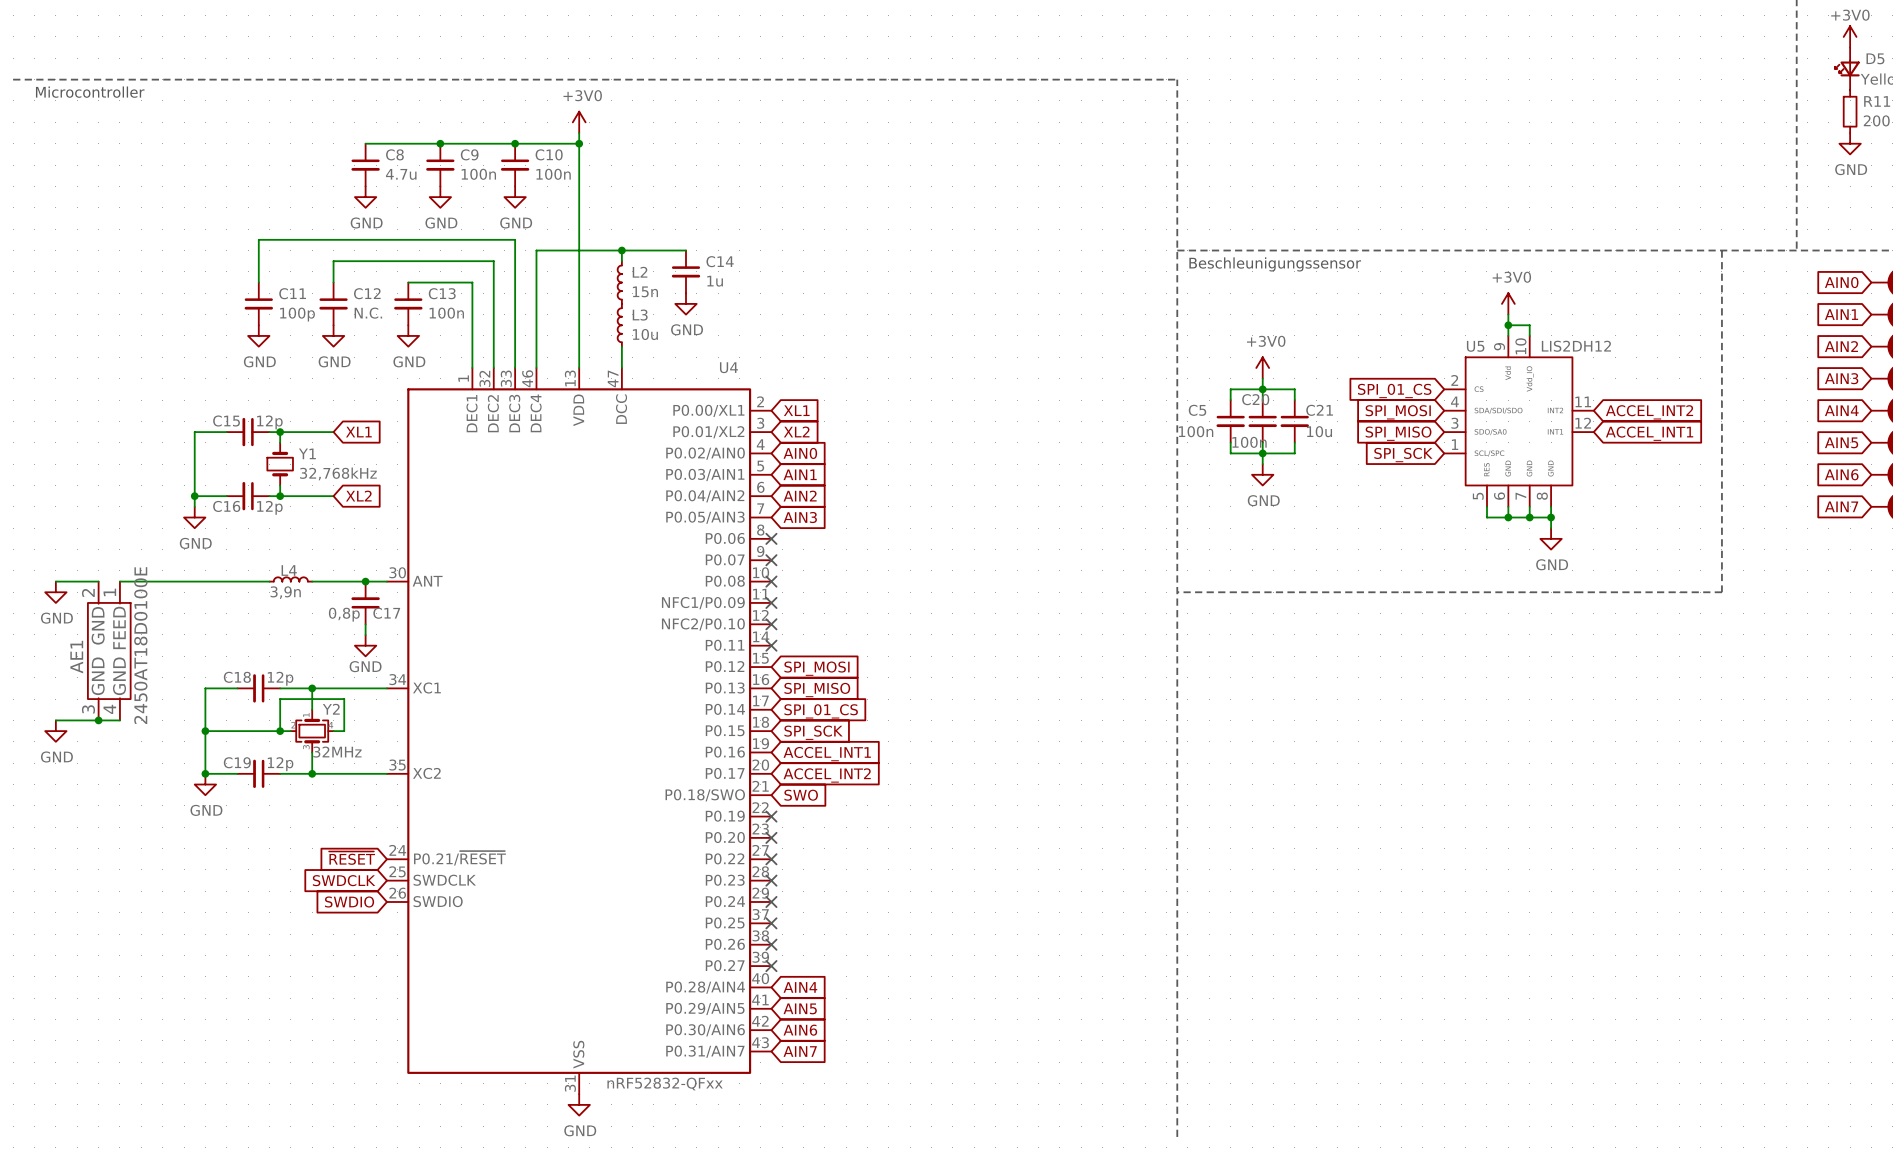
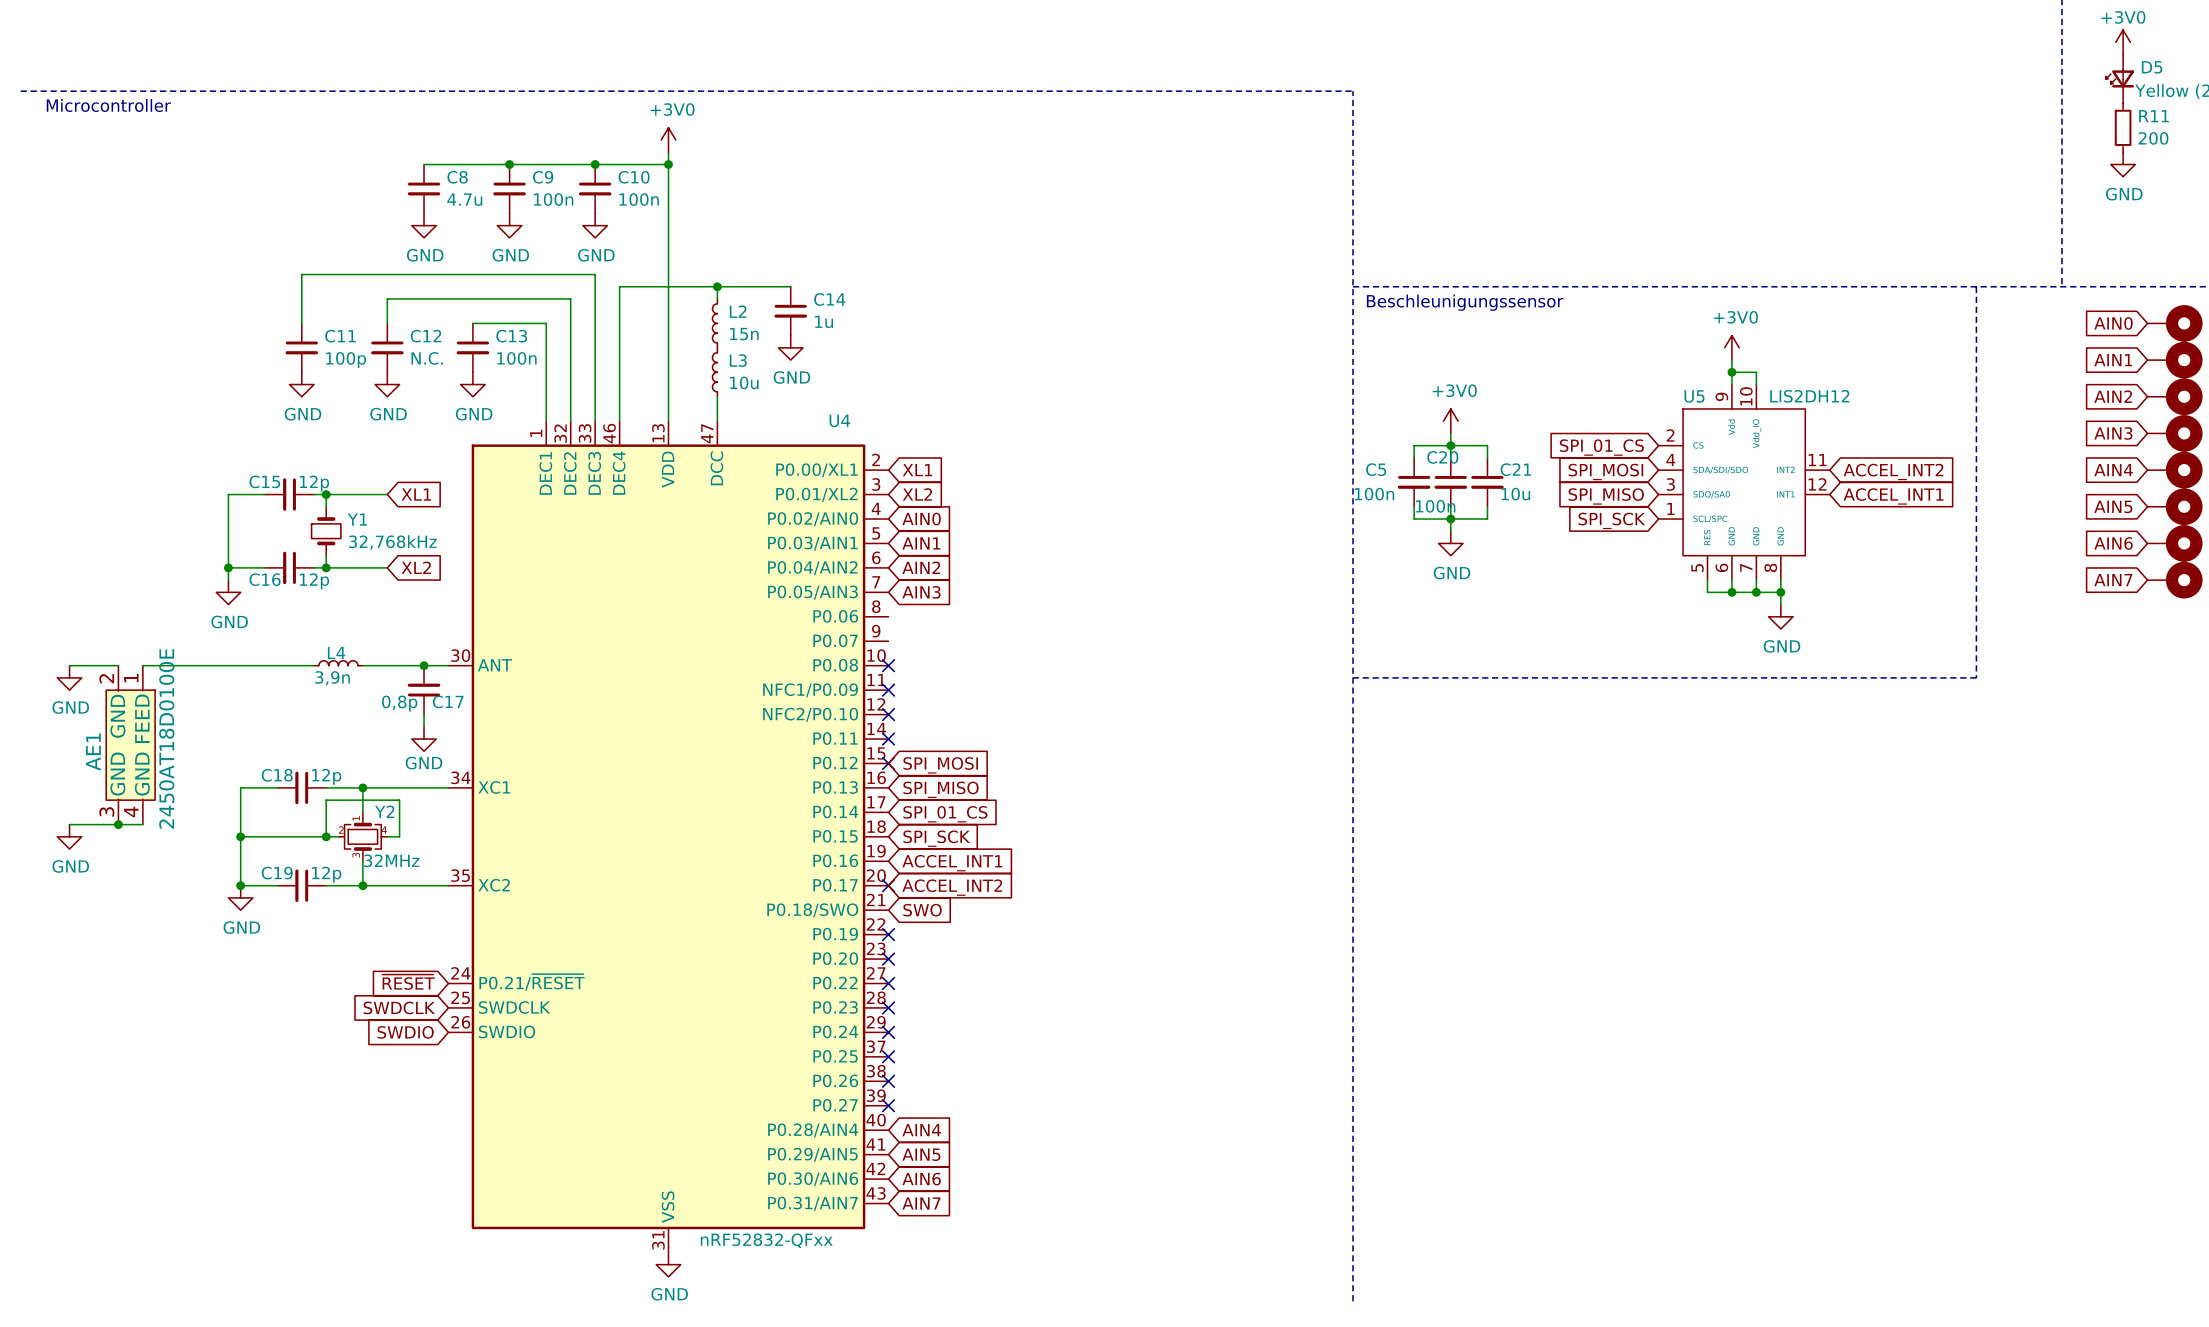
no-connect mark: (771, 538) -> none
no-connect mark: (771, 560) -> none
no-connect mark: none -> (888, 763)
no-connect mark: none -> (888, 885)

